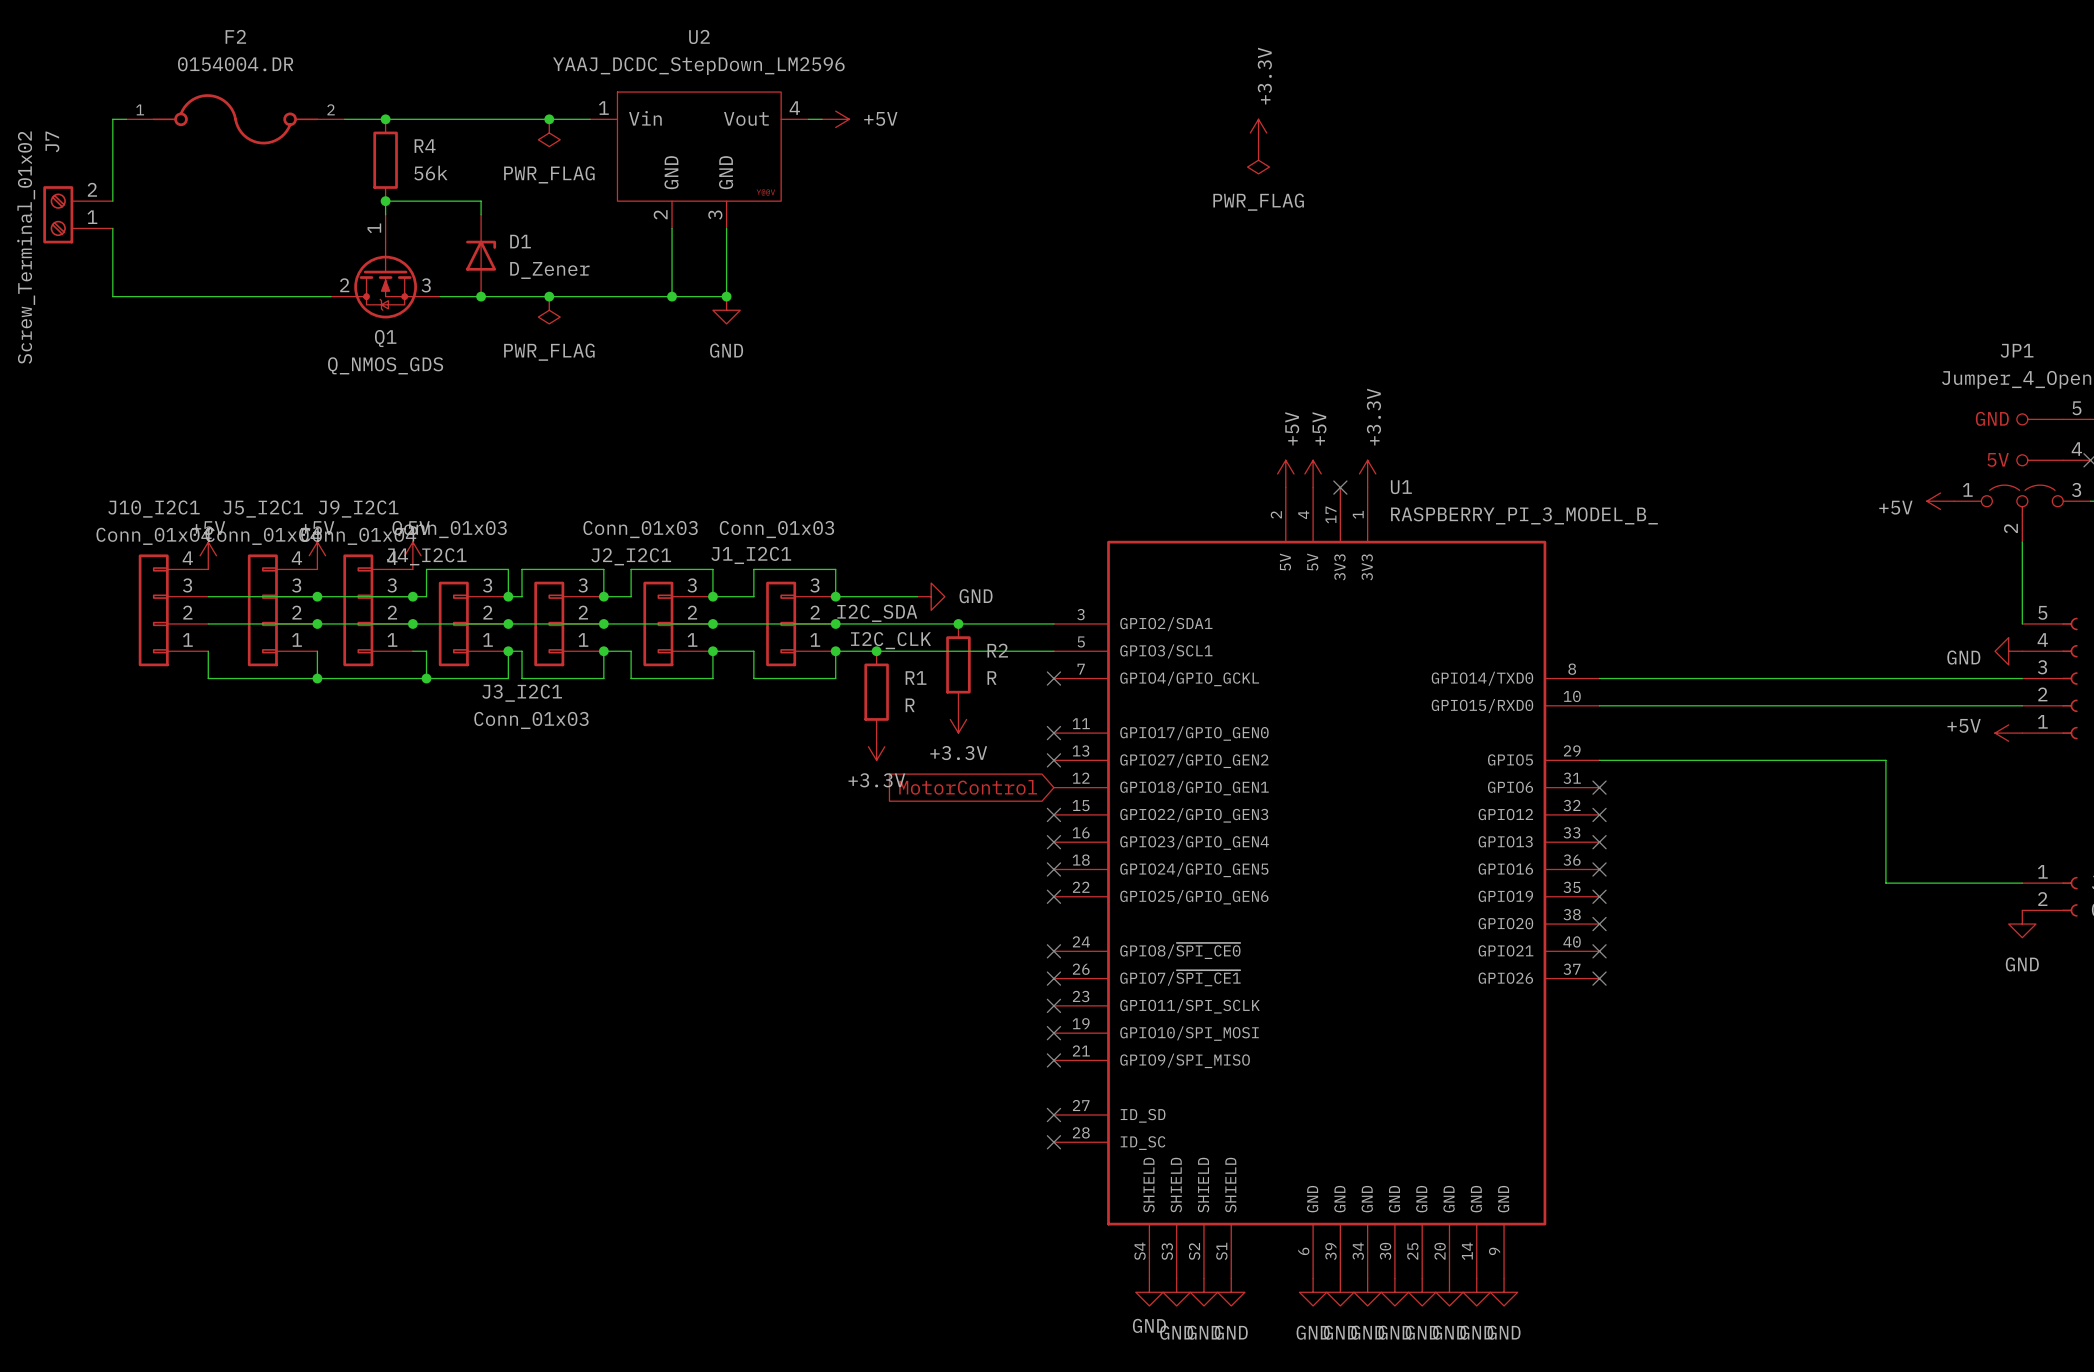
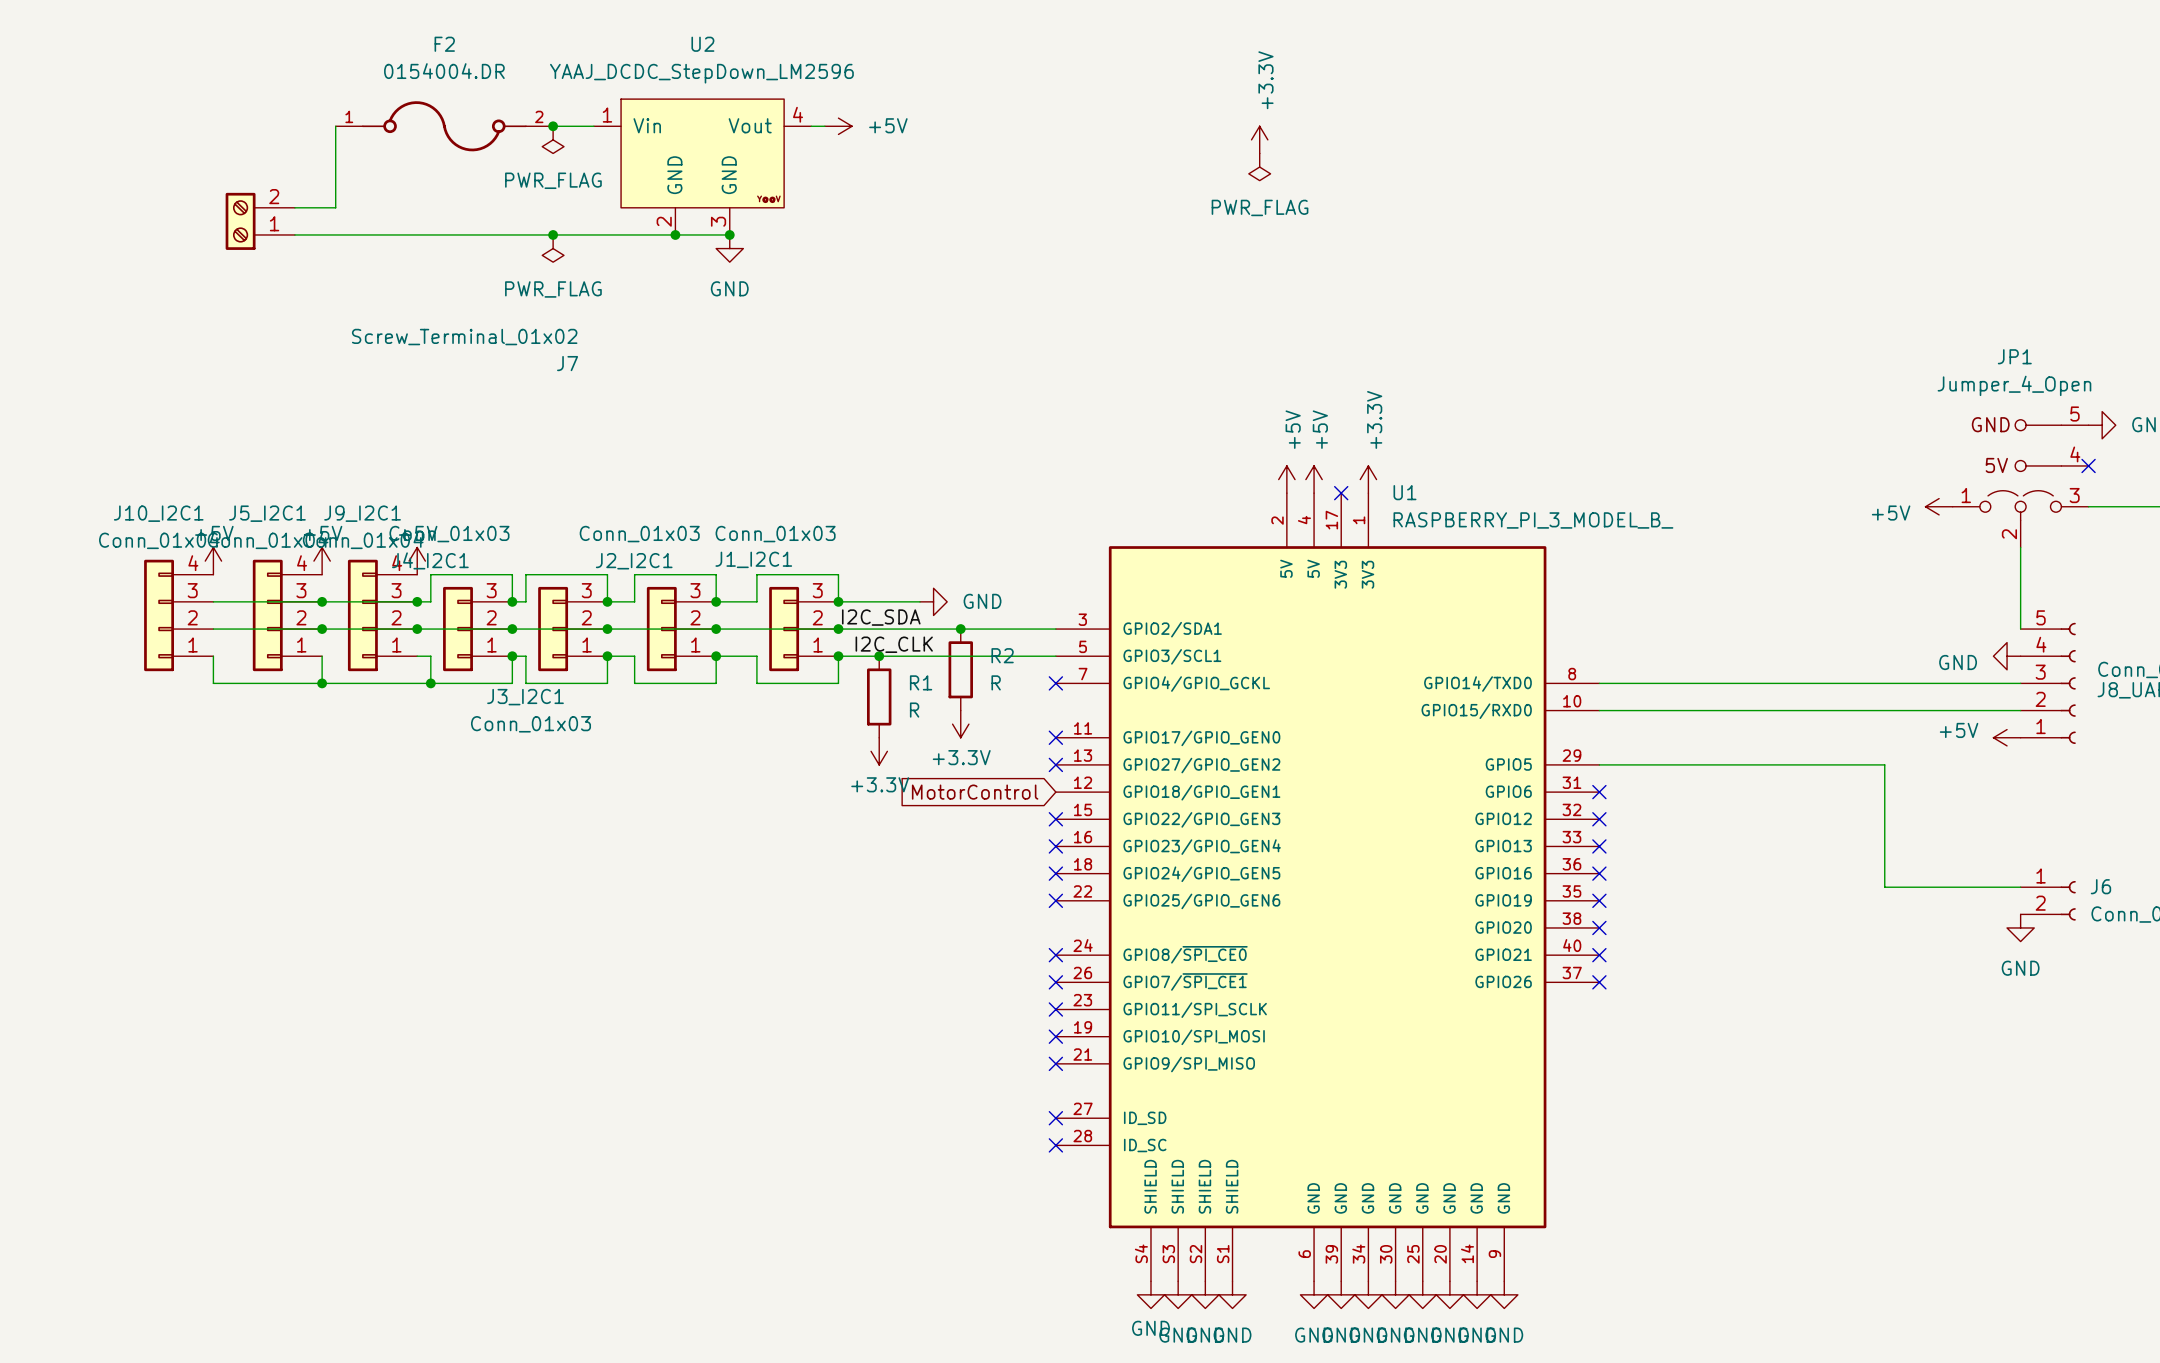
wire: (126, 119) (112, 119) (112, 201) -> none
F2 position: (235, 119) -> (444, 126)
wire: none -> (335, 126) (335, 207) (294, 207)
wire: (344, 119) (549, 119) -> none
junction: (385, 119) -> none
J7 name rotation: 0° (52, 141) -> 90° clockwise (567, 363)
J7 name position: J7 (52, 141) -> J7 (567, 363)
R4: 56k (385, 160) -> none
junction: (385, 201) -> none
J7 position: (78, 214) -> (260, 221)
wire: (385, 214) (385, 201) (481, 201) (481, 214) -> none
wire: (112, 228) (112, 296) (331, 296) -> none
junction: none -> (553, 234)
wire: (672, 228) (672, 296) -> none
junction: none -> (675, 234)
wire: (726, 228) (726, 296) (440, 296) -> (729, 234) (294, 234)
junction: none -> (729, 234)
J7 value rotation: 0° (26, 247) -> 90° clockwise (464, 337)
D1: D_Zener (481, 255) -> none
Q1: Q_NMOS_GDS (385, 266) -> none
junction: (481, 296) -> none
junction: (549, 296) -> none
junction: (672, 296) -> none
junction: (726, 296) -> none
power symbol position: PWR_FLAG (549, 310) -> PWR_FLAG (553, 248)
power symbol position: GND (726, 310) -> GND (729, 248)

